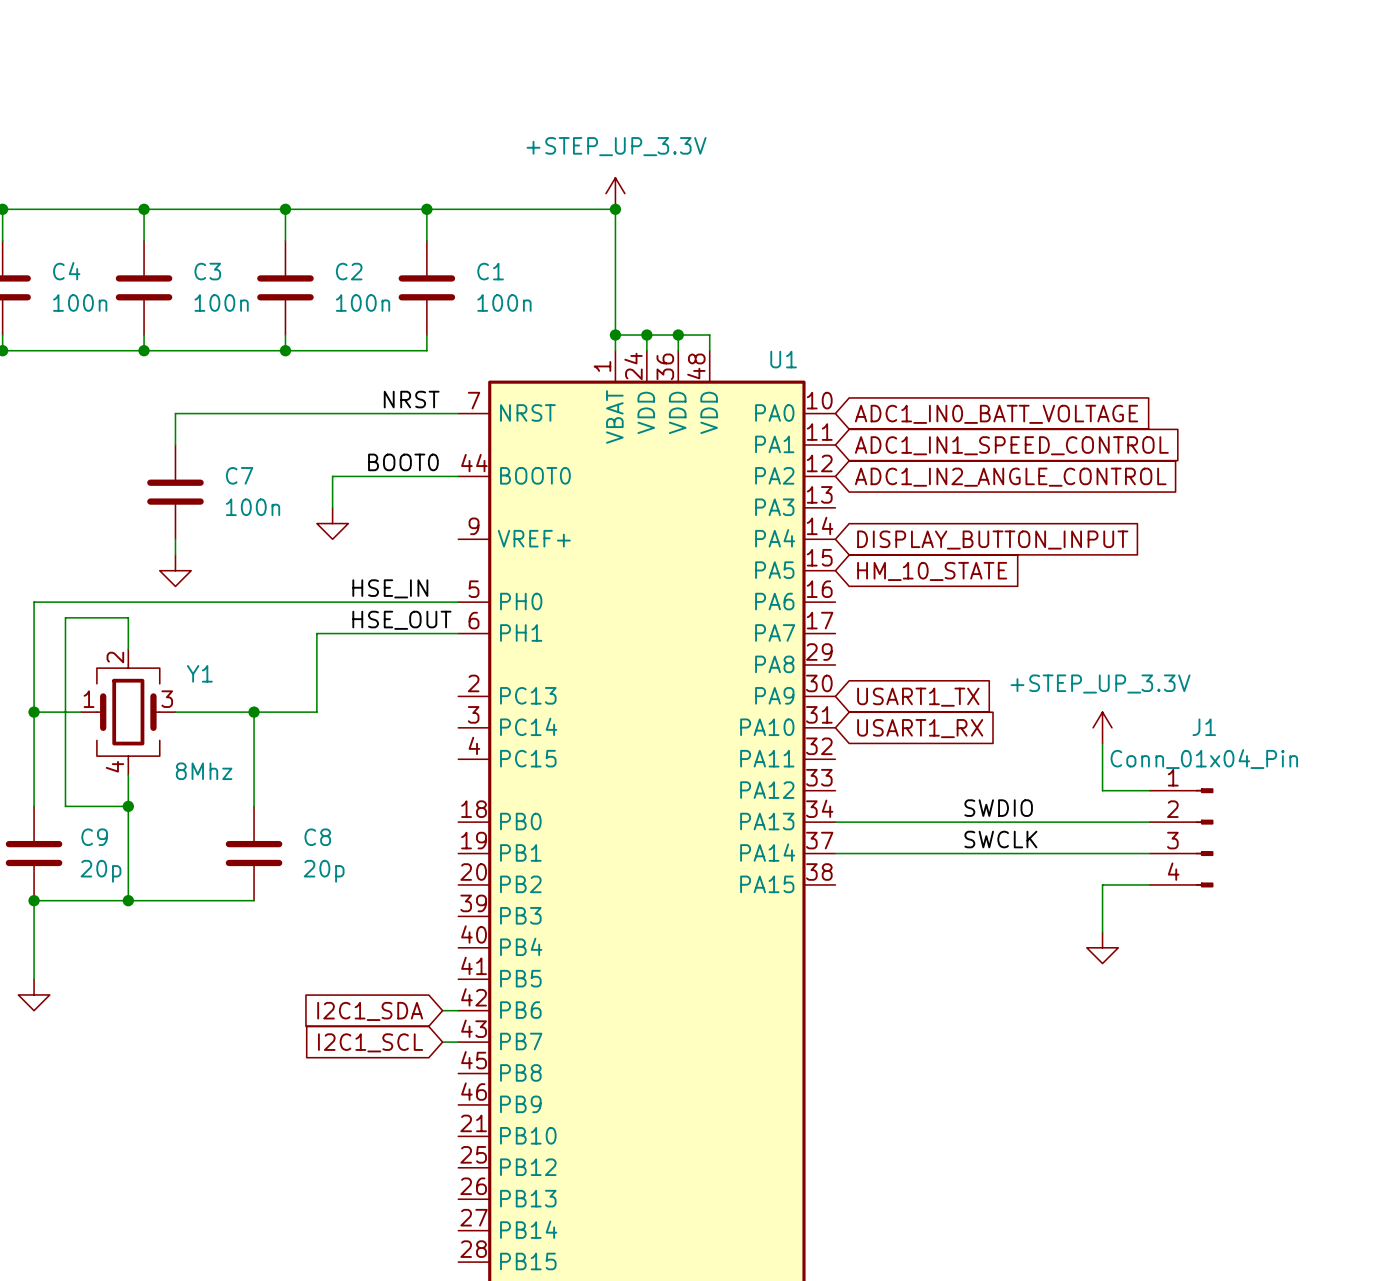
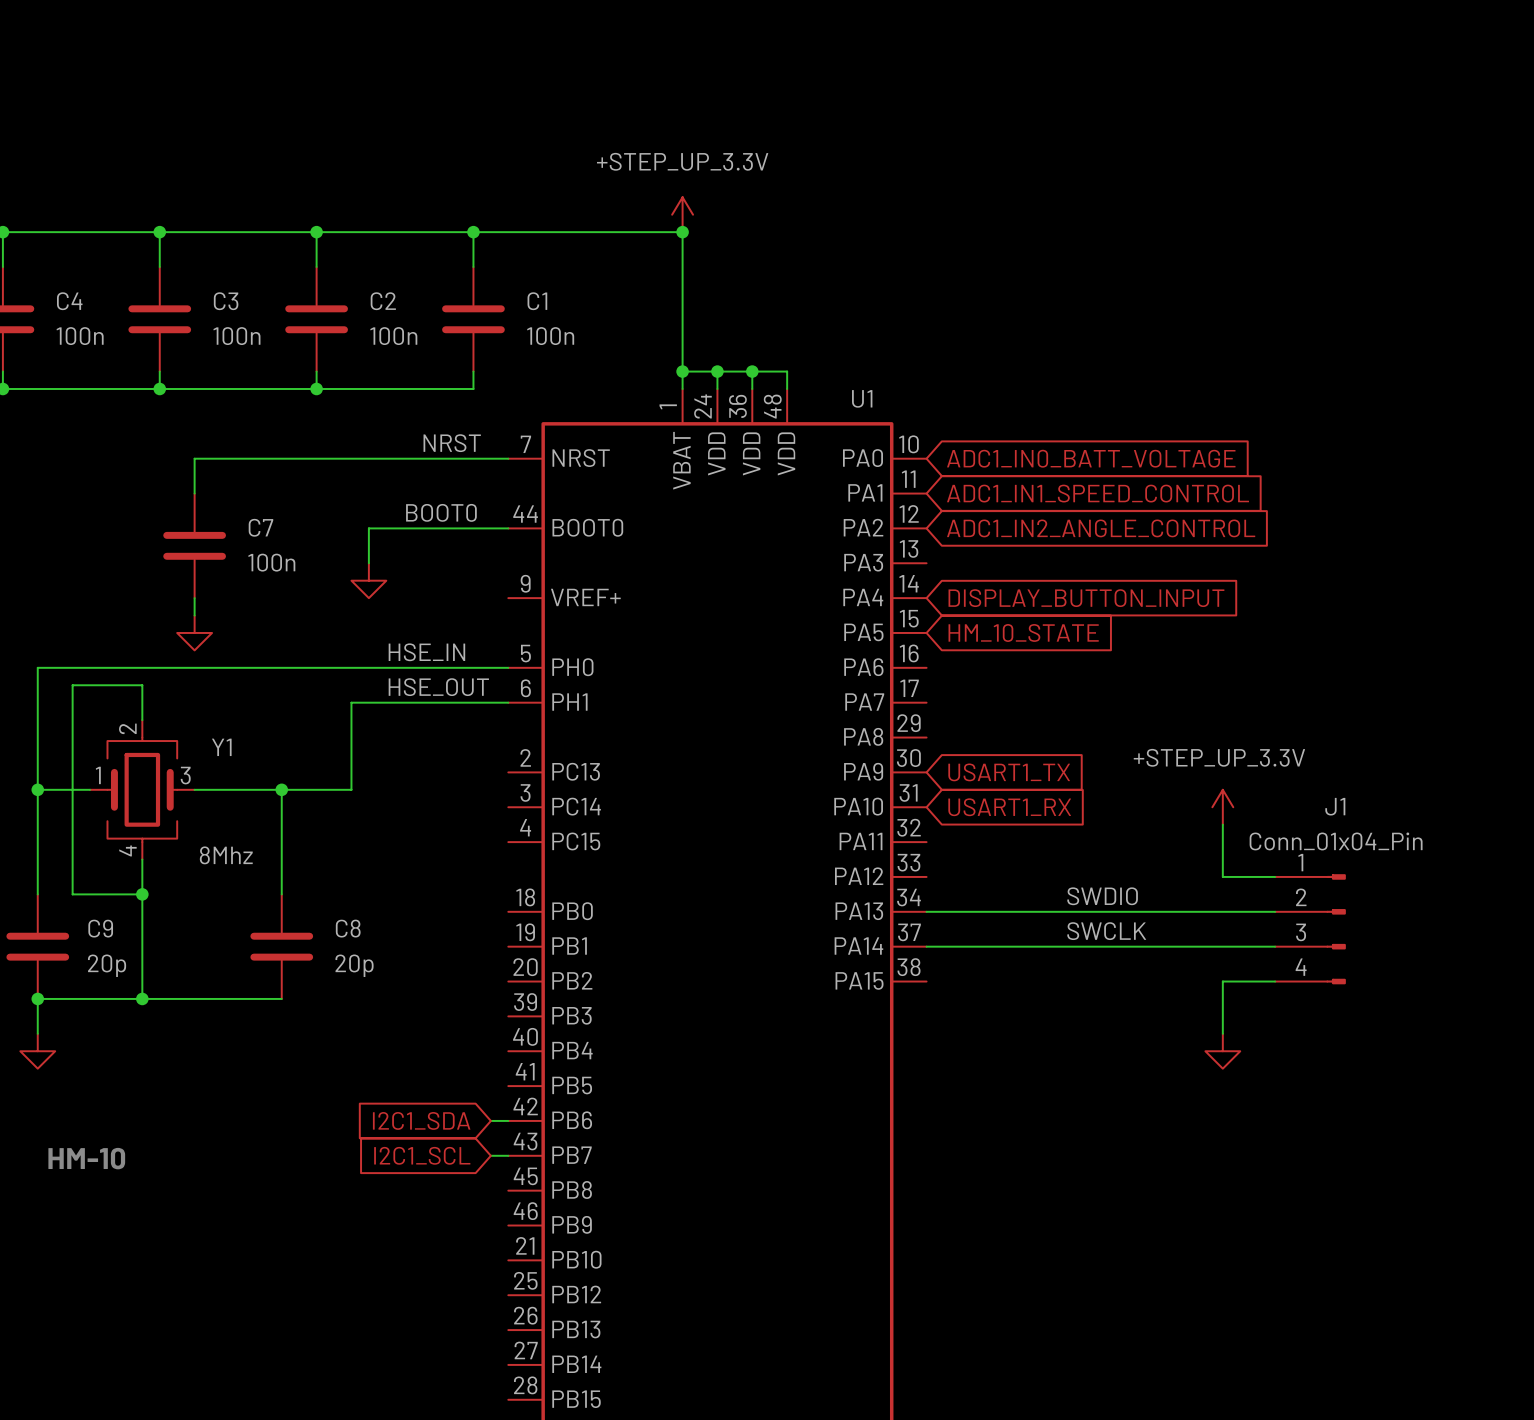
wire: (34, 932) (34, 979) -> none
power symbol position: (34, 994) -> (37, 1051)
text: none -> HM-10 (86, 1158)

